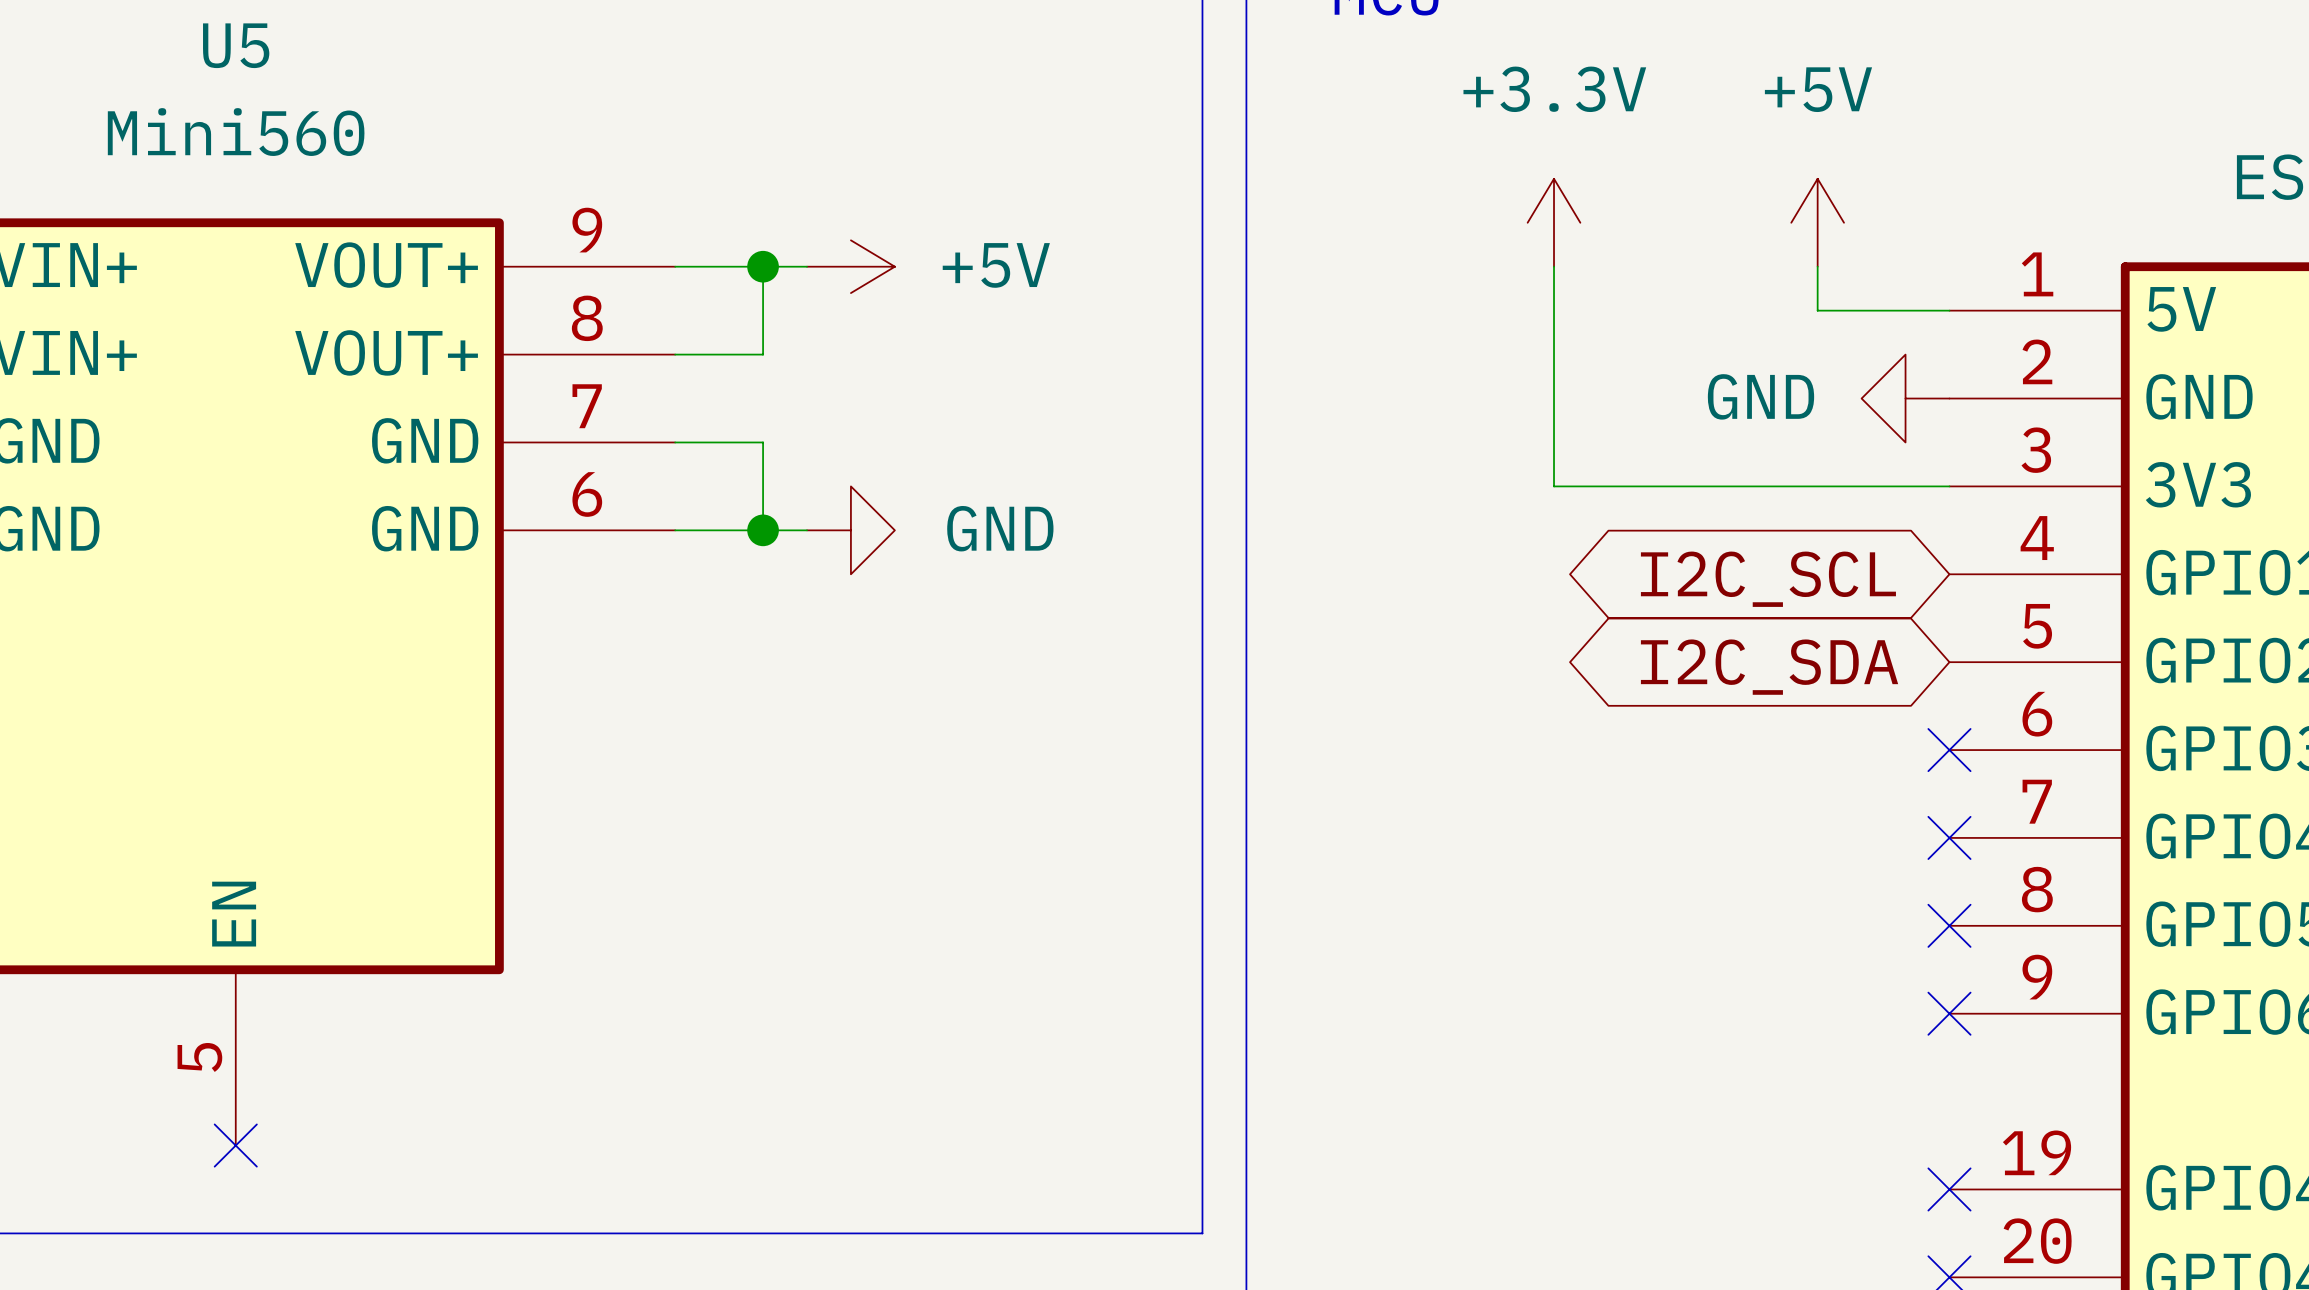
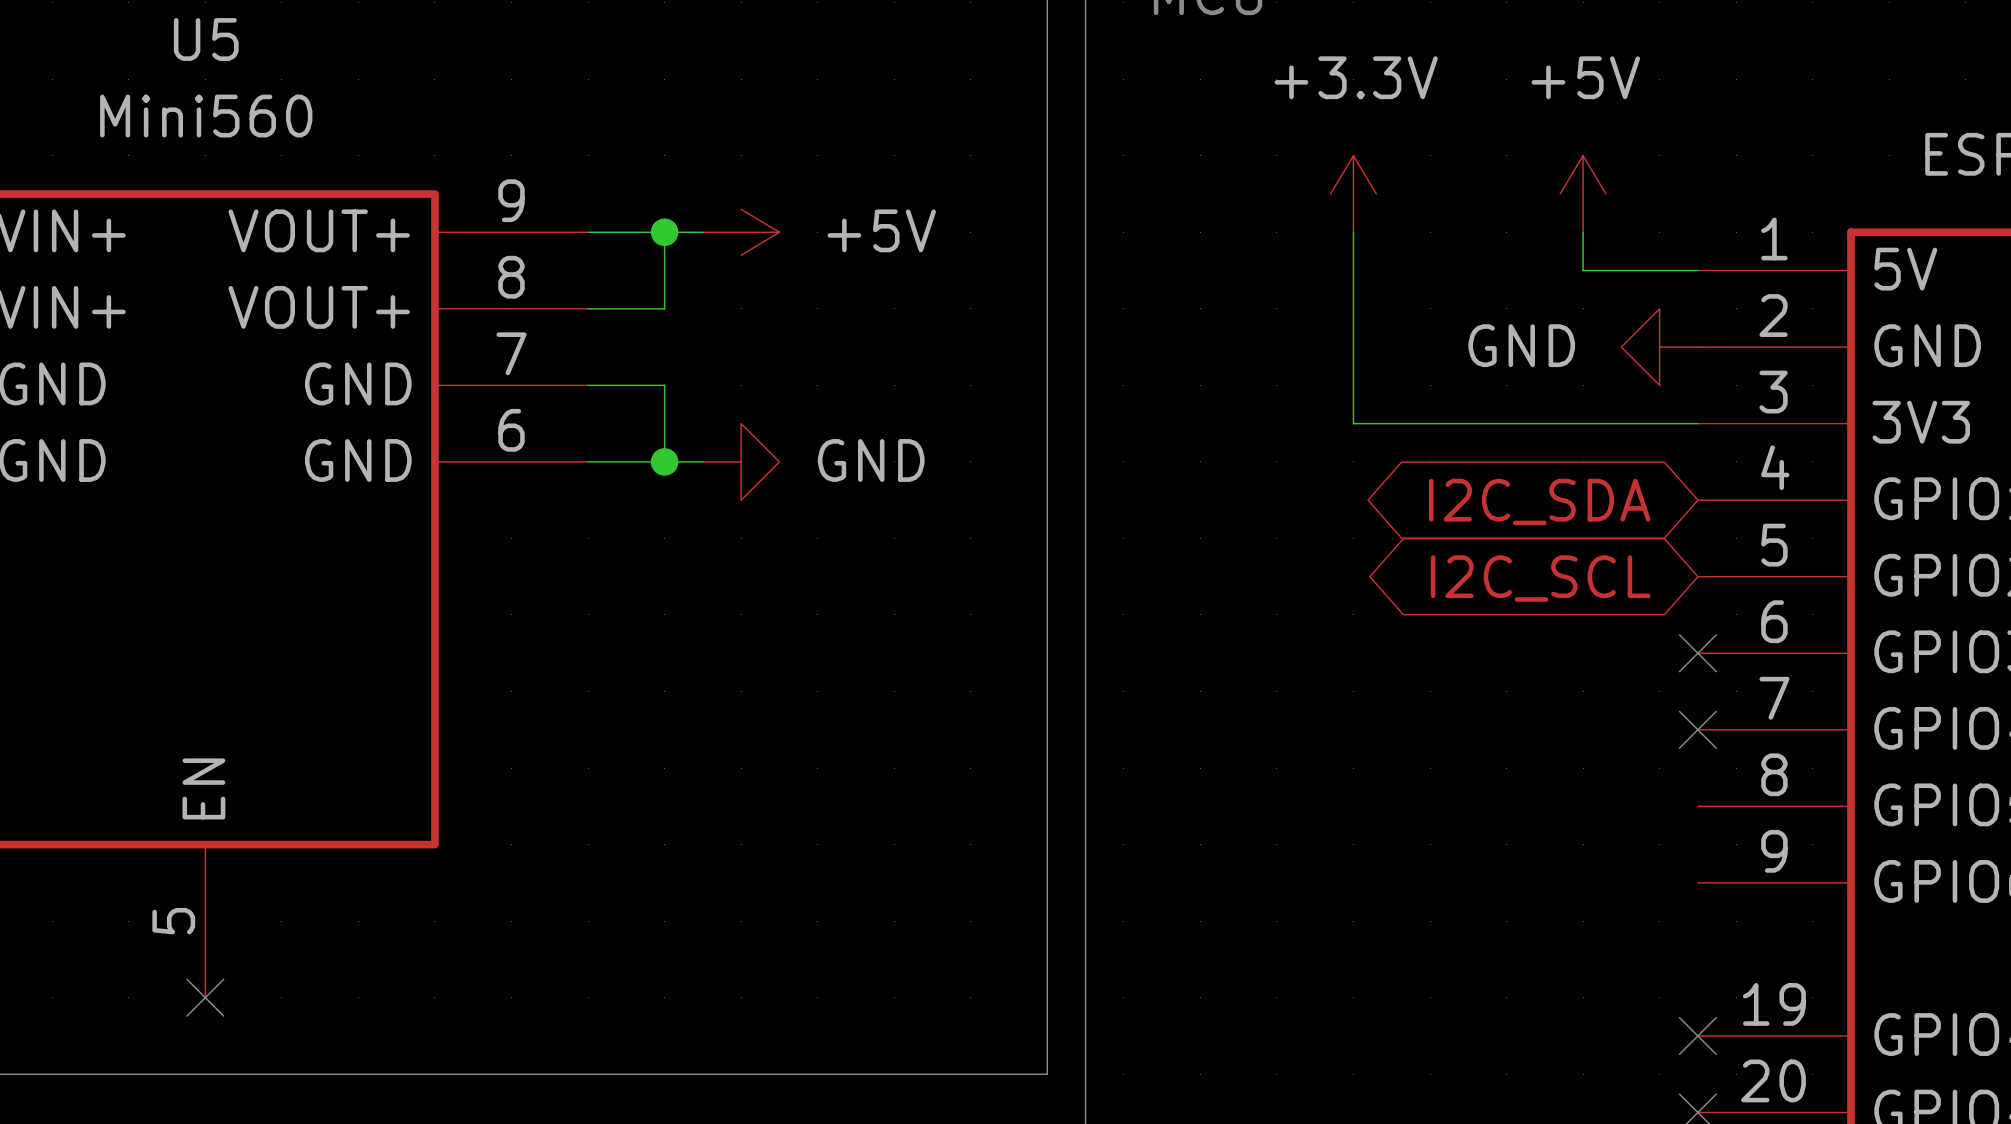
global label: I2C_SCL (1768, 579) -> I2C_SDA (1539, 502)
global label: I2C_SDA (1769, 667) -> I2C_SCL (1540, 578)
no-connect mark: (1949, 925) -> none
no-connect mark: (1949, 1013) -> none

